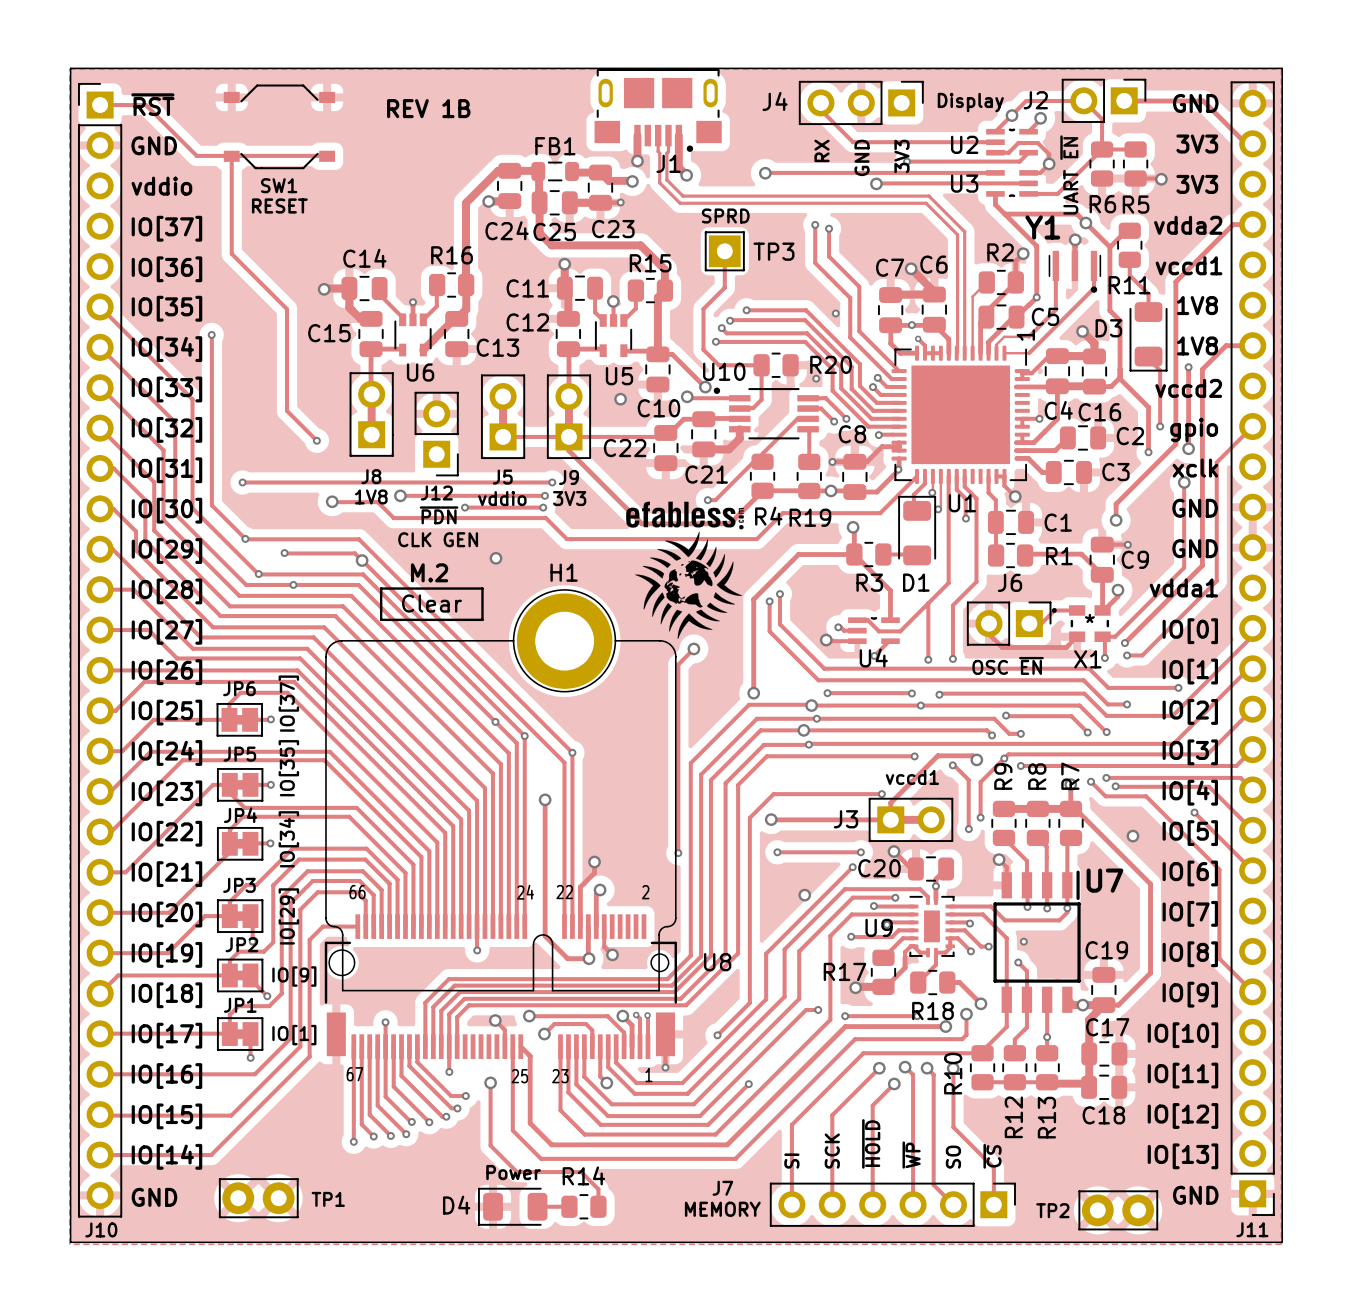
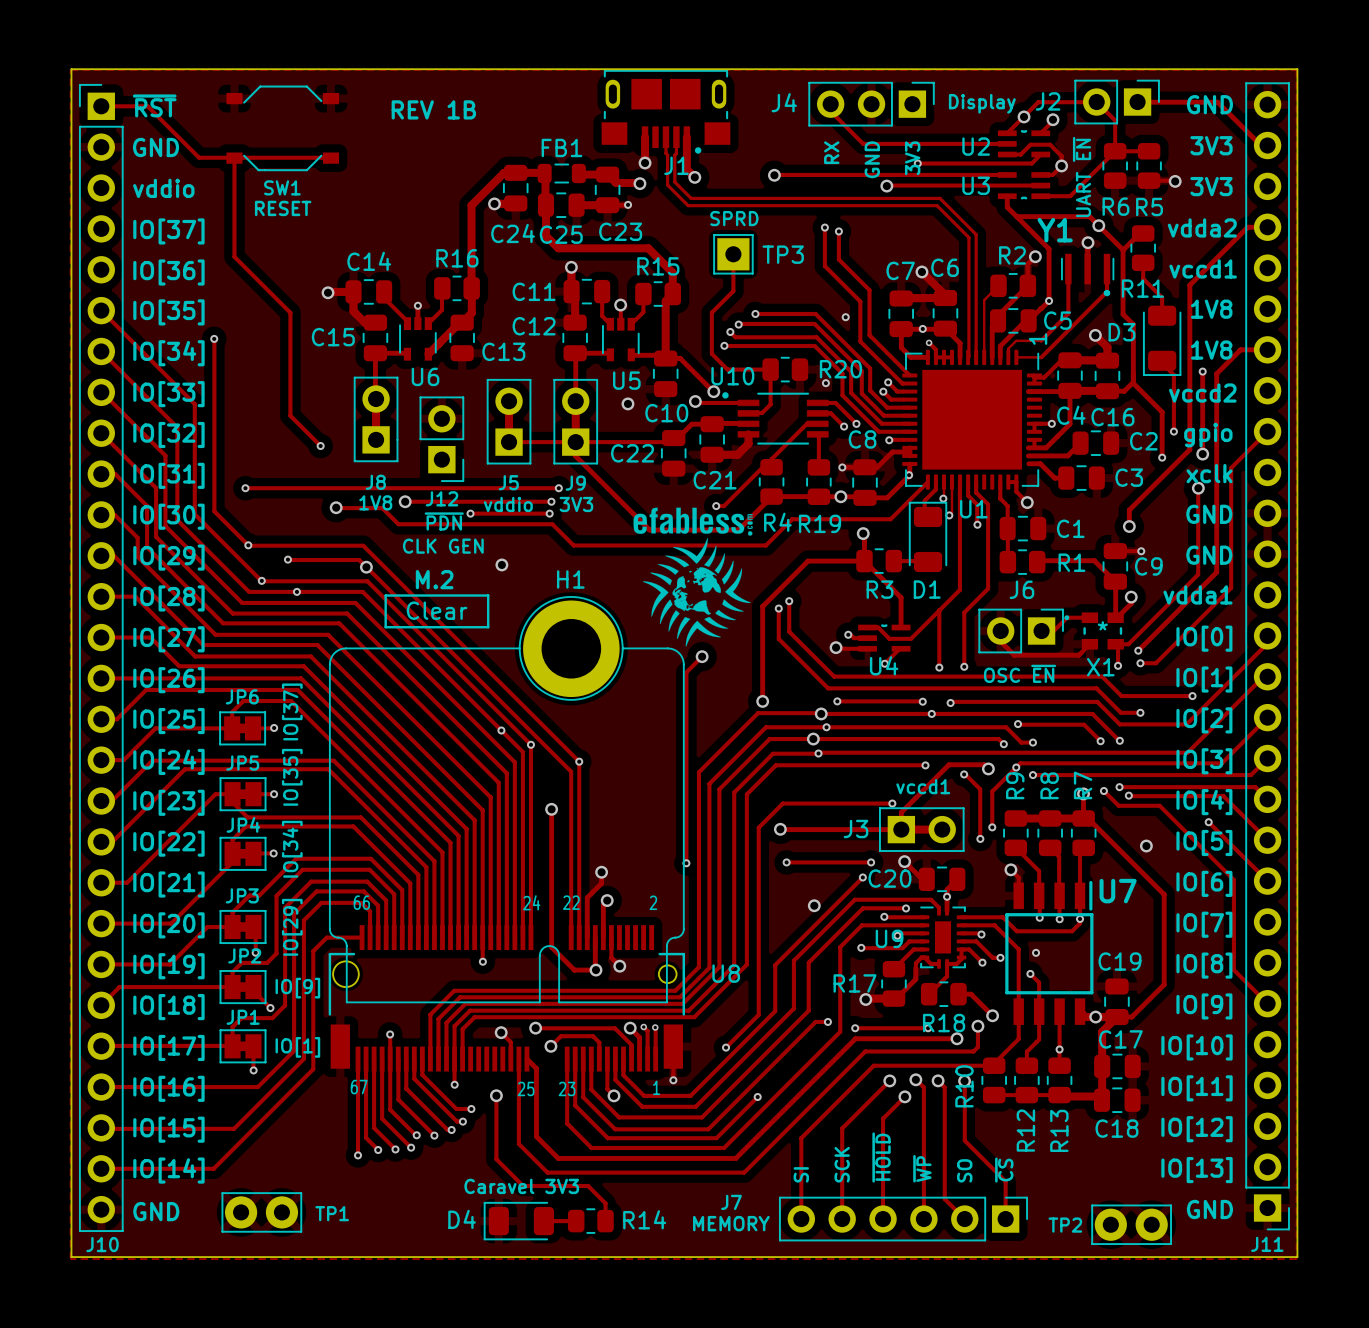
text: Power (513, 1172) -> Caravel 3V3 (521, 1186)
R14 name position: R14 (583, 1175) -> R14 (644, 1219)

